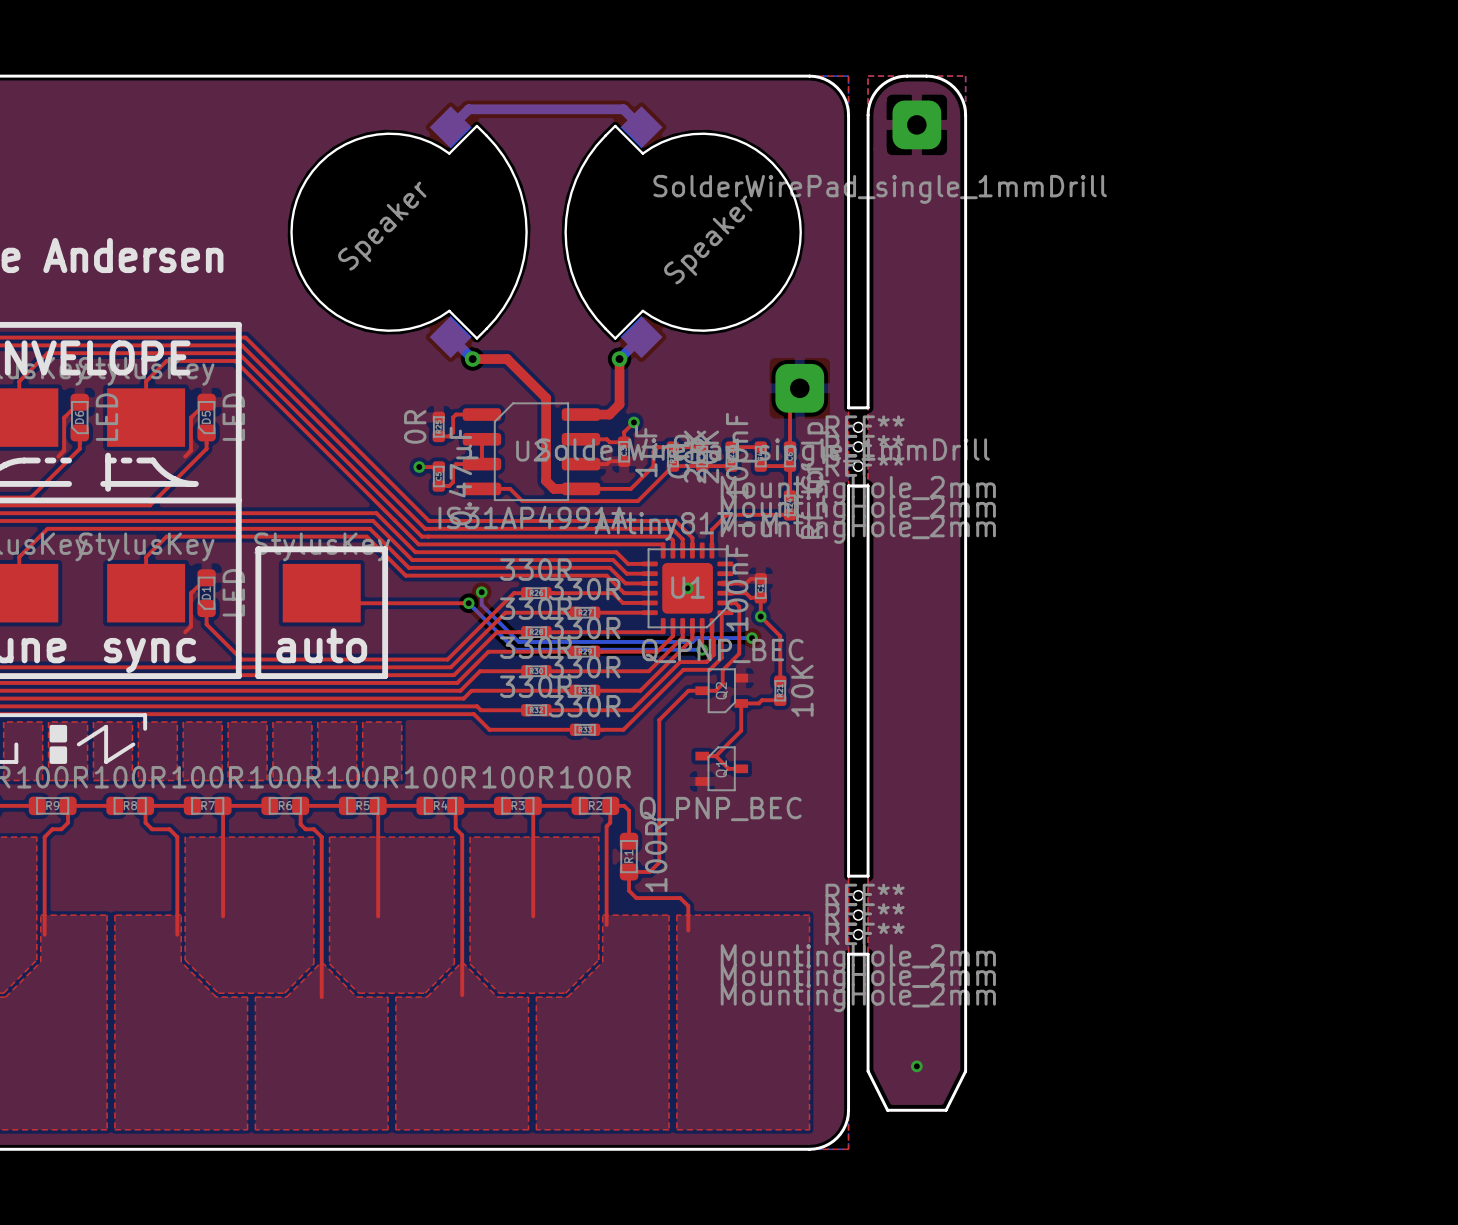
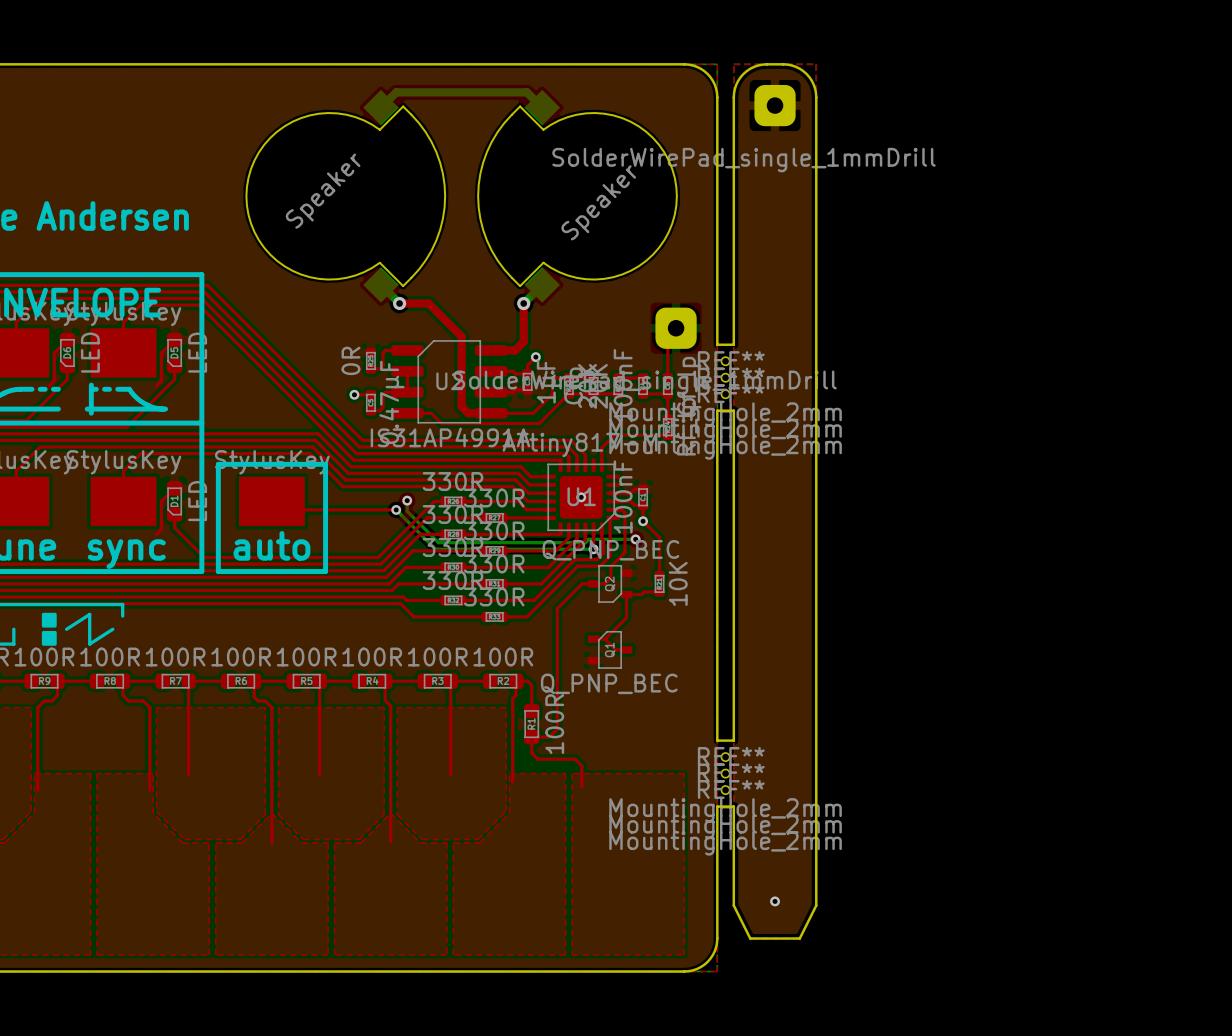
top zone outline: (3, 721) (42, 721) (42, 780) (3, 780) (3, 721) -> none
top zone outline: (48, 721) (87, 721) (87, 780) (48, 780) (48, 721) -> none
top zone outline: (93, 721) (132, 721) (132, 780) (93, 780) (93, 721) -> none
top zone outline: (138, 721) (177, 721) (177, 780) (138, 780) (138, 721) -> none
top zone outline: (183, 721) (222, 721) (222, 780) (183, 780) (183, 721) -> none
top zone outline: (228, 721) (267, 721) (267, 780) (228, 780) (228, 721) -> none
top zone outline: (272, 721) (311, 721) (311, 780) (272, 780) (272, 721) -> none
top zone outline: (317, 721) (356, 721) (356, 780) (317, 780) (317, 721) -> none
top zone outline: (362, 721) (401, 721) (401, 780) (362, 780) (362, 721) -> none

